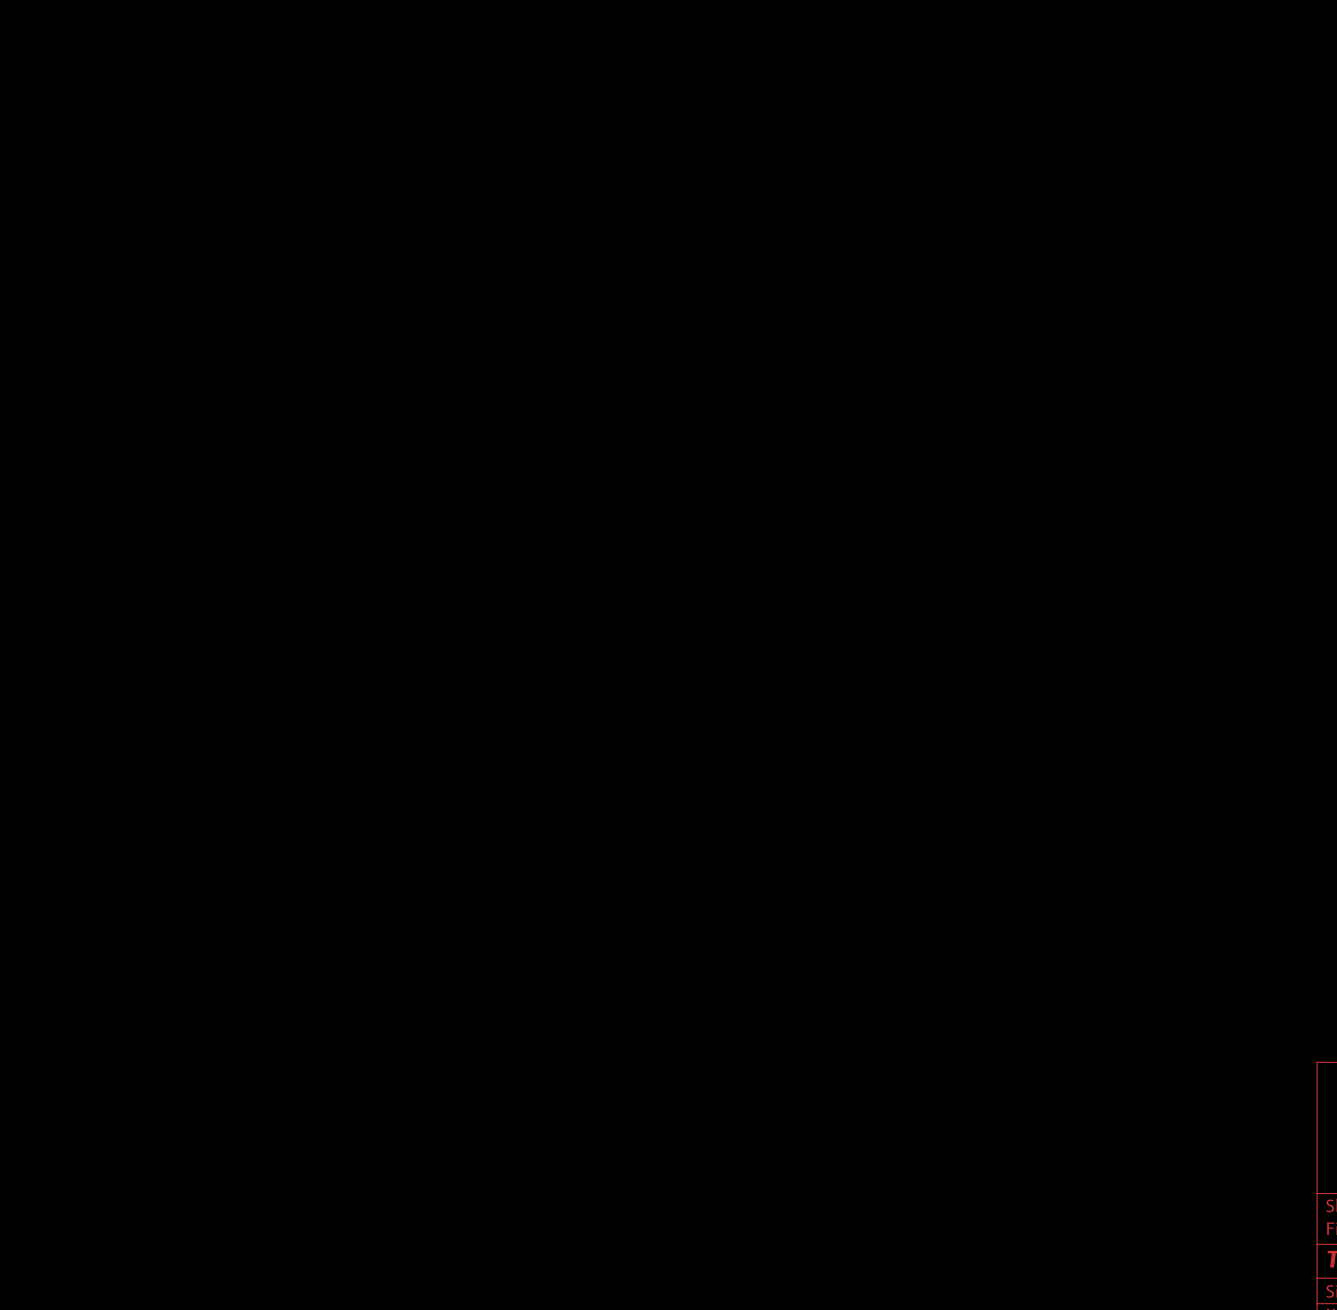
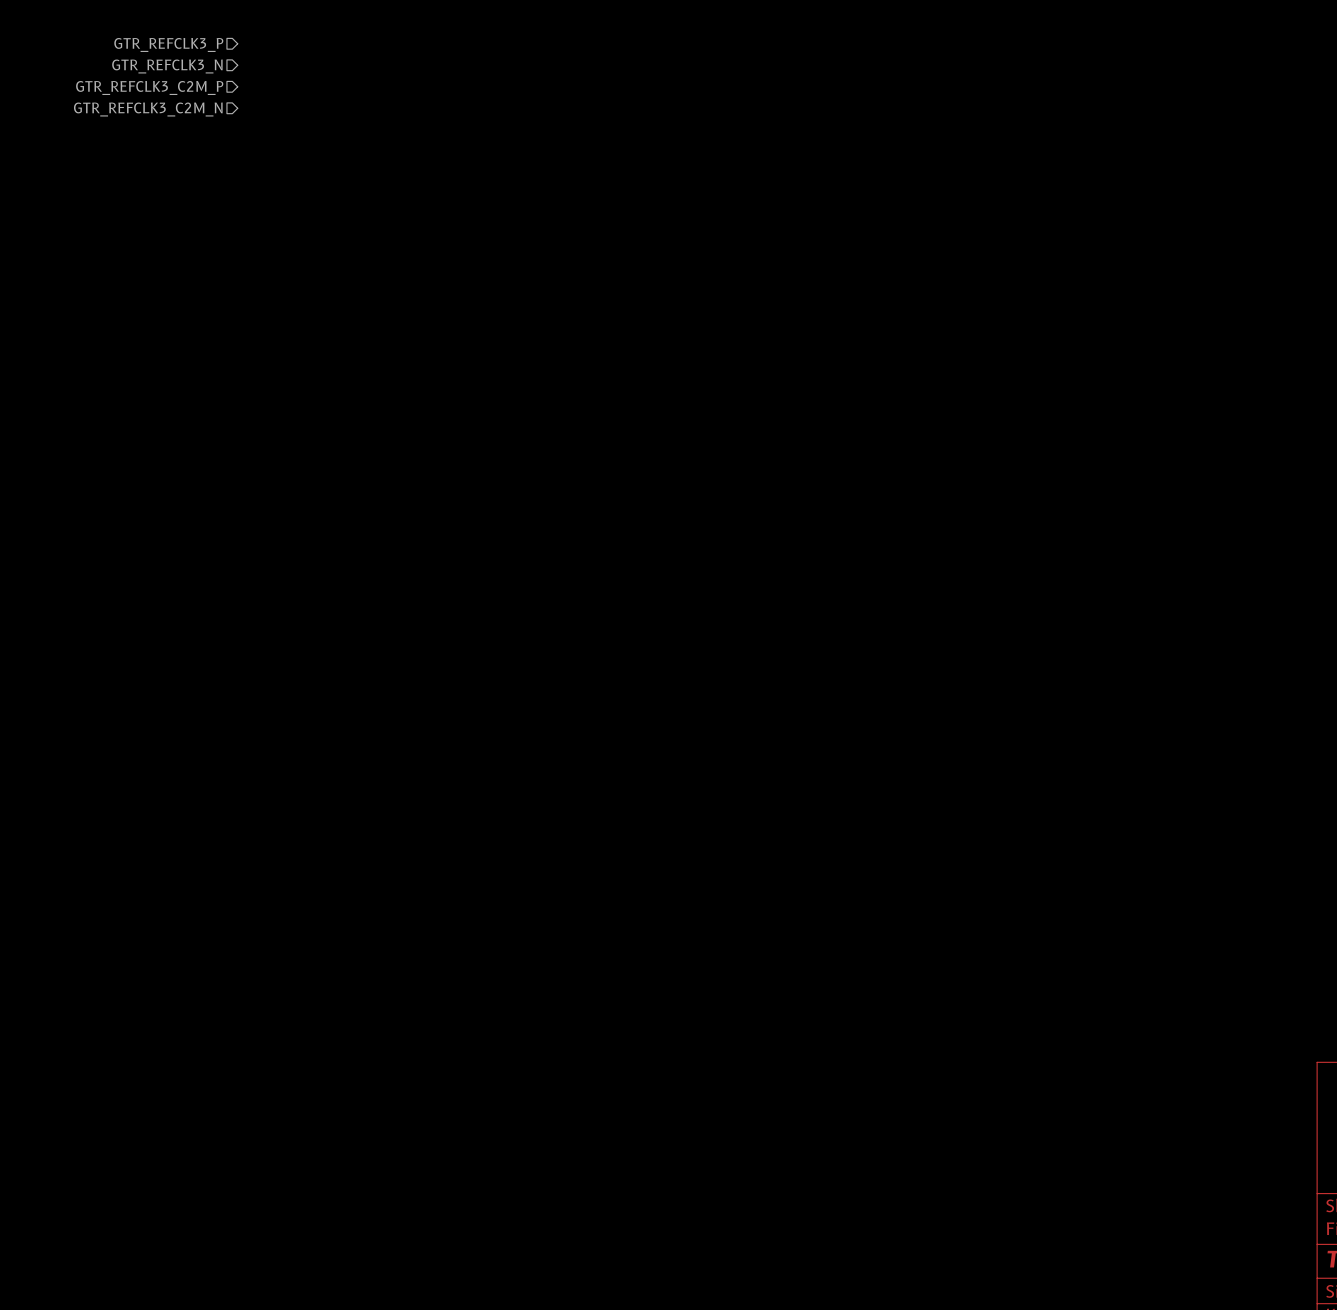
hierarchical label: none -> GTR_REFCLK3_P (168, 44)
hierarchical label: none -> GTR_REFCLK3_N (167, 66)
hierarchical label: none -> GTR_REFCLK3_C2M_P (149, 87)
hierarchical label: none -> GTR_REFCLK3_C2M_N (148, 109)

